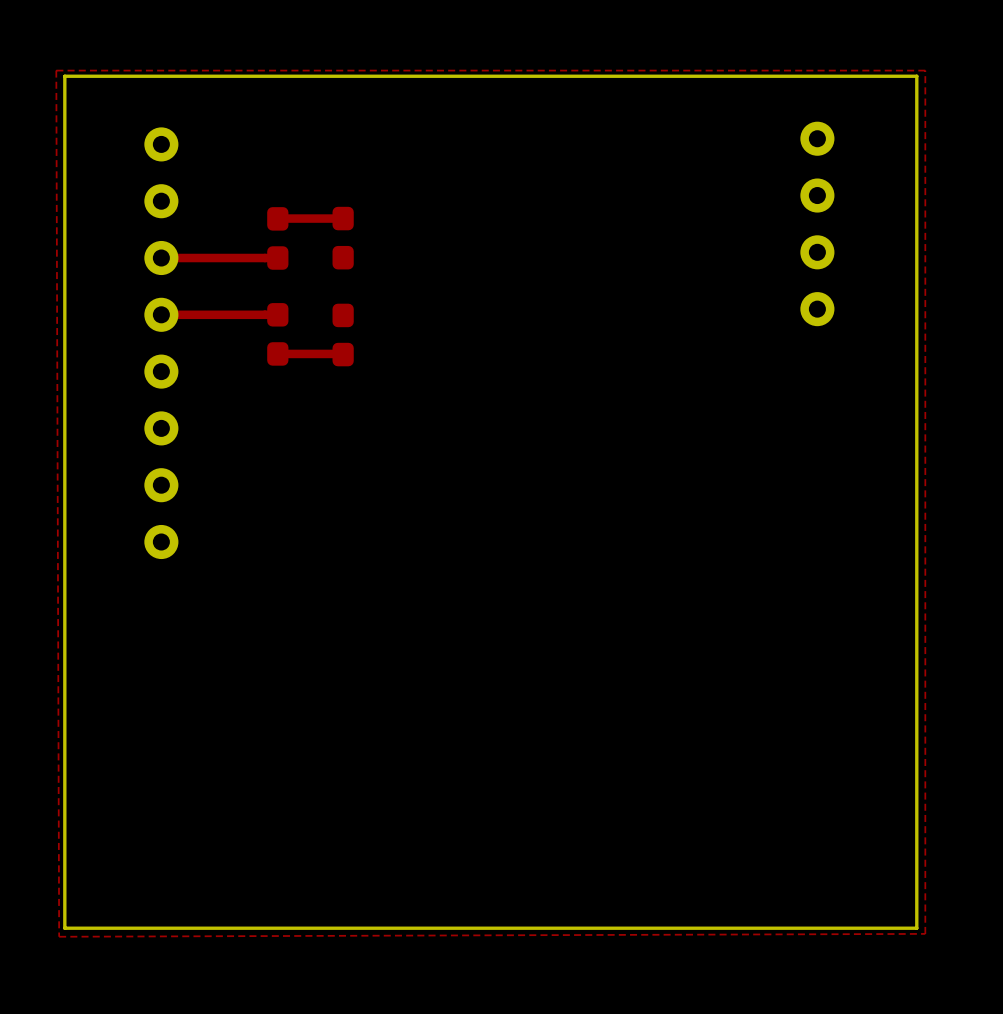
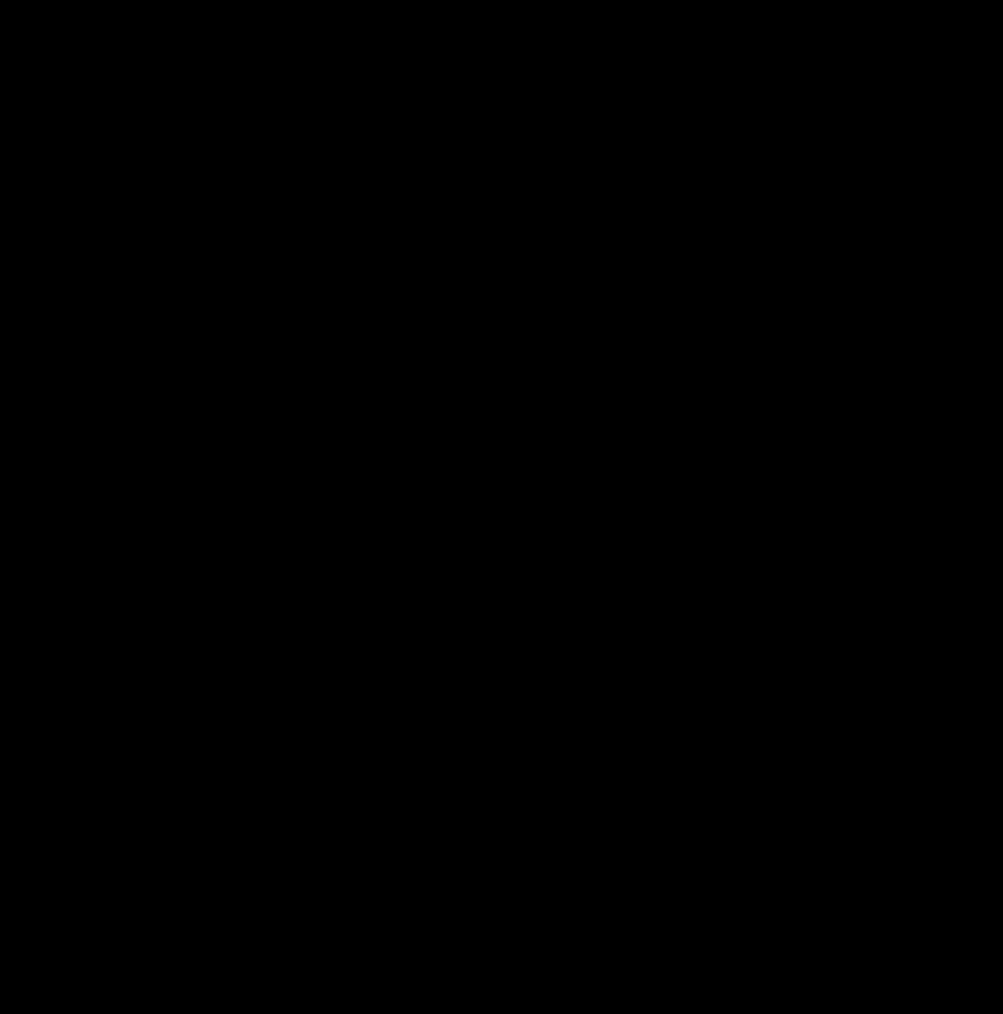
top zone outline: (925, 70) (56, 70) (59, 936) (925, 933) (925, 70) -> none
board edge: (916, 76) (916, 928) (64, 928) (64, 76) (916, 76) -> none
top track: (343, 218) (278, 218) -> none
part: (817, 223) -> none
part: (277, 238) -> none
part: (343, 238) -> none
top track: (277, 258) (161, 258) -> none
top track: (277, 314) (161, 314) -> none
part: (277, 334) -> none
part: (343, 335) -> none
part: (161, 343) -> none
top track: (277, 353) (343, 354) -> none

